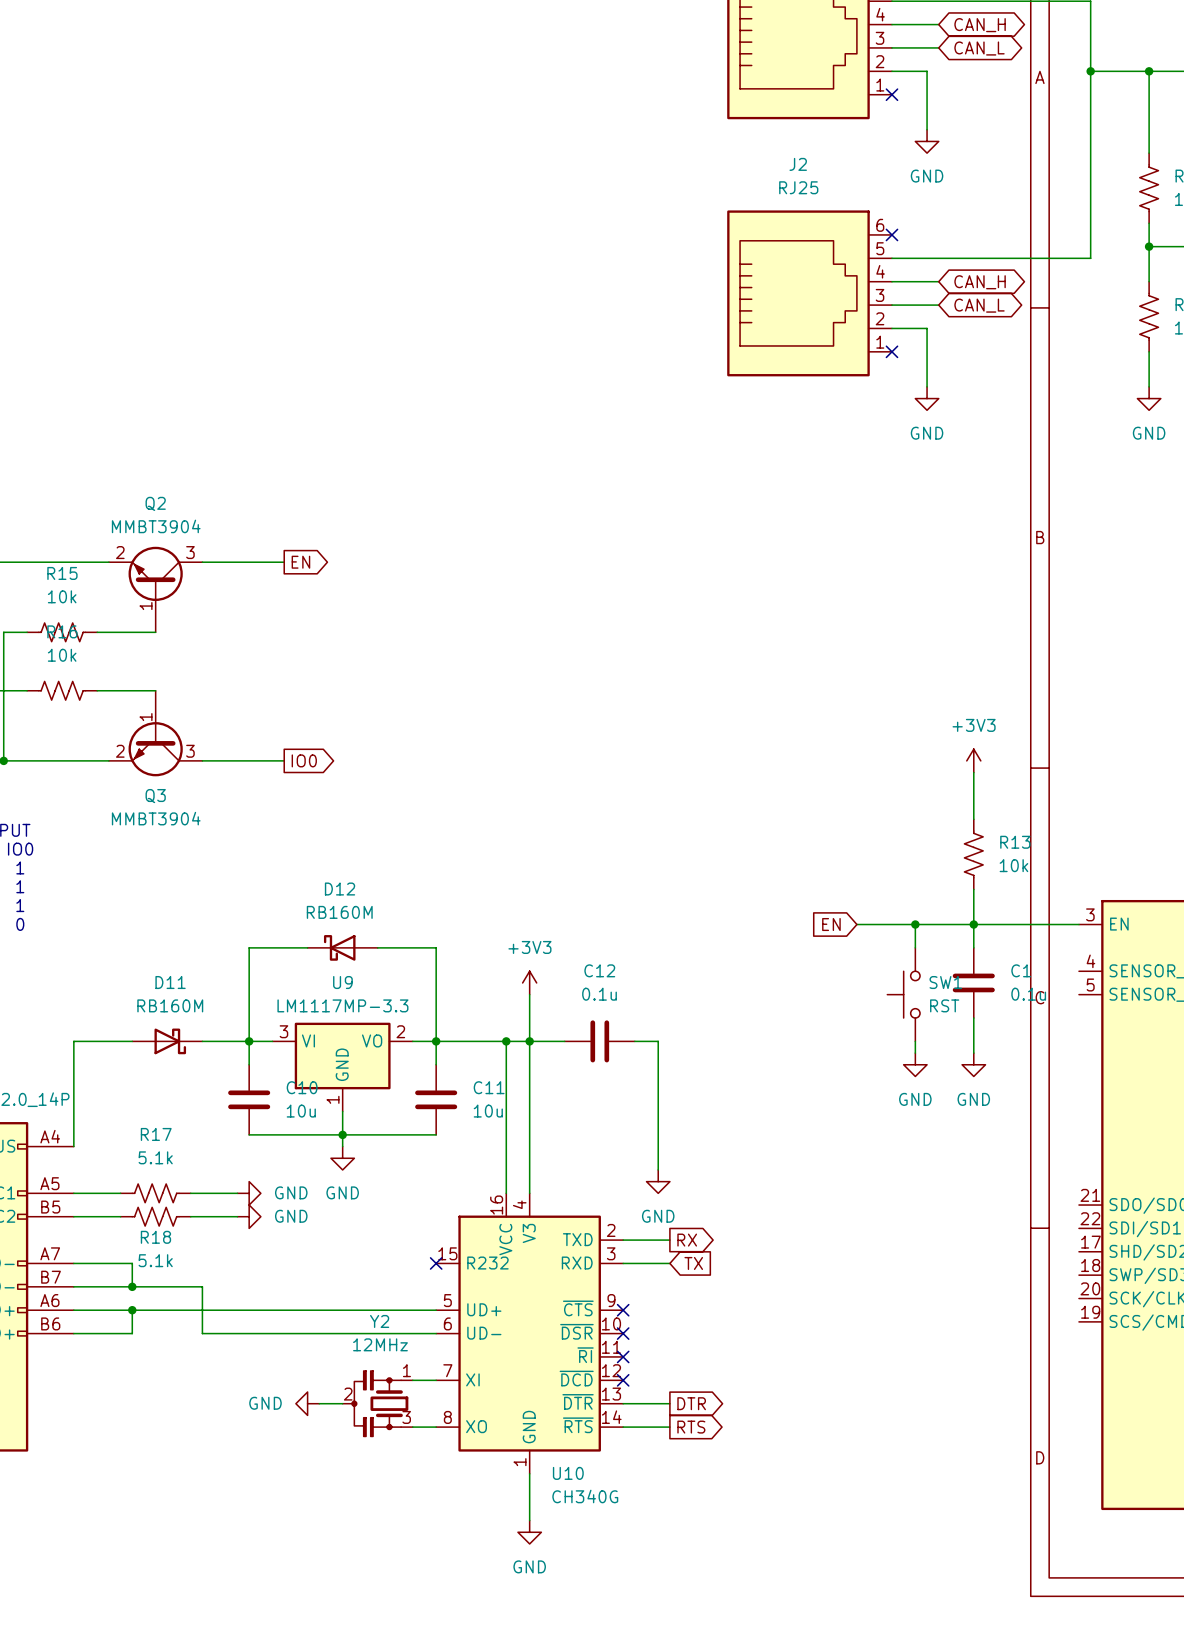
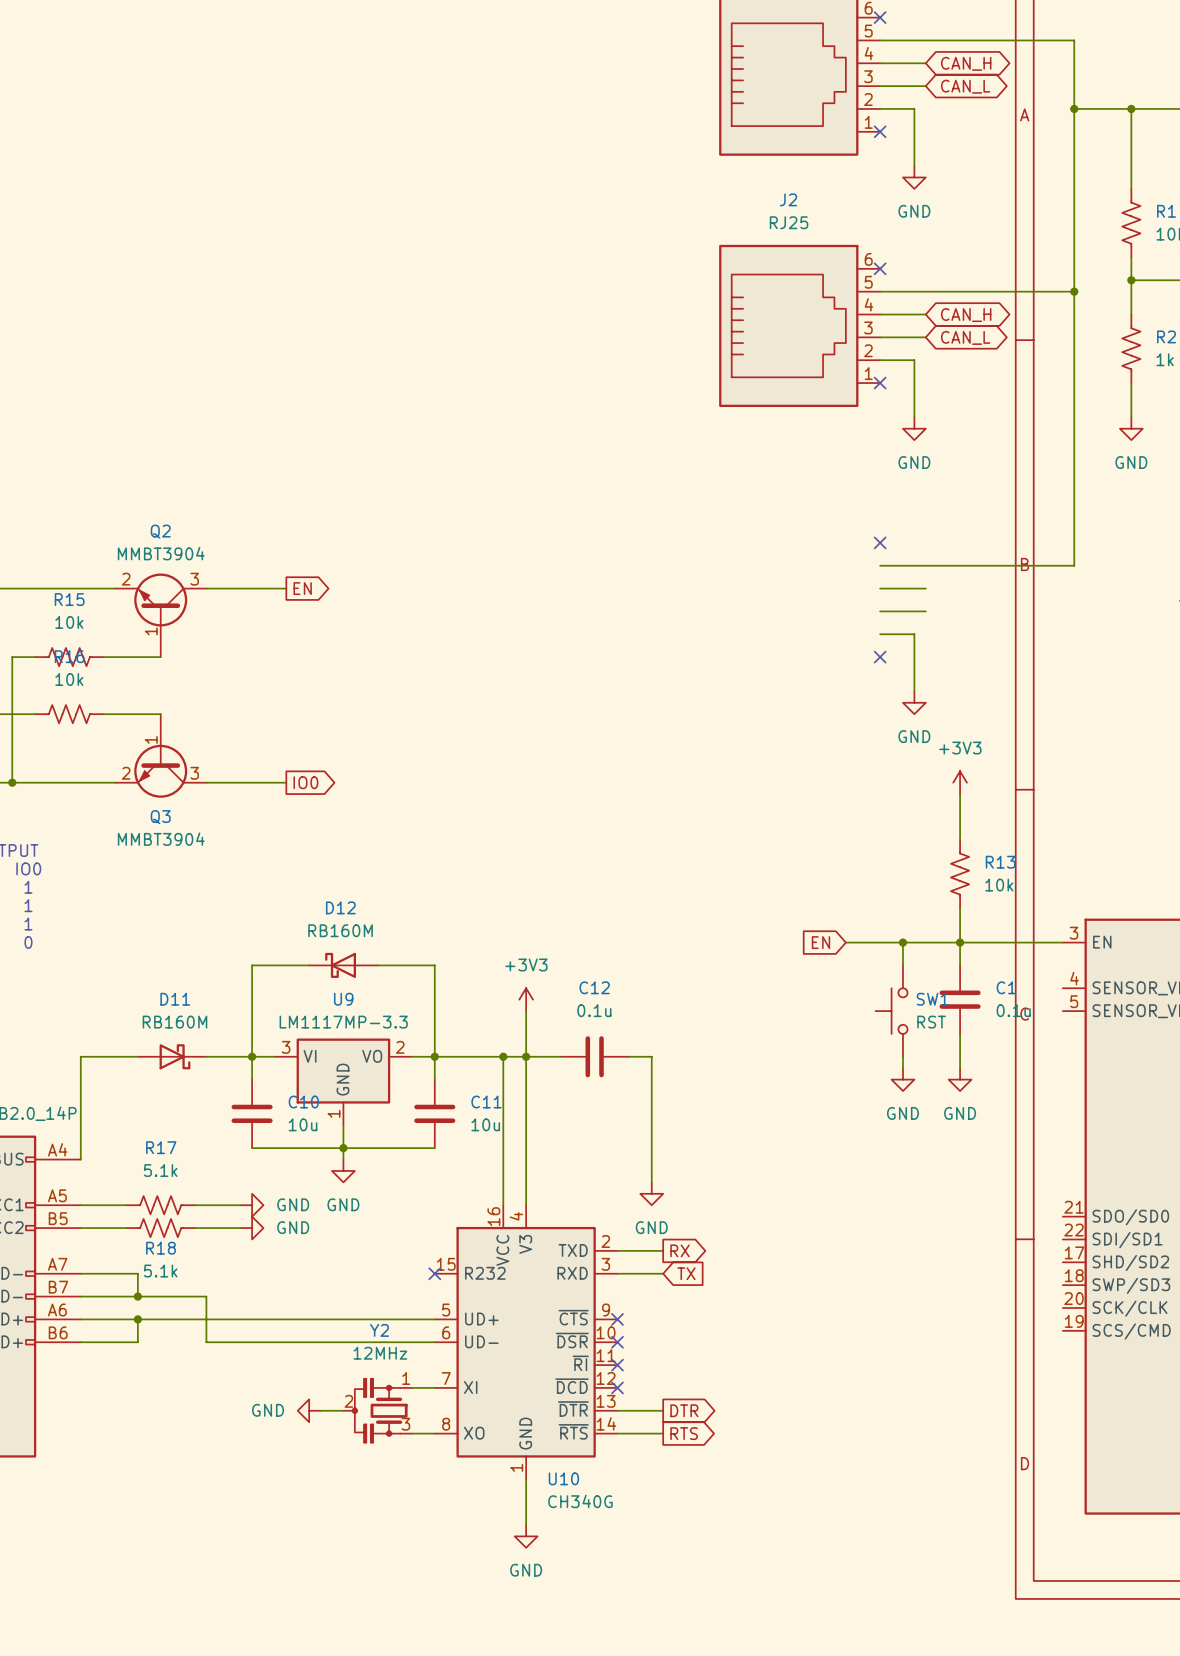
wire: none -> (1074, 291) (1074, 565) (880, 565)
junction: none -> (1074, 291)
no-connect mark: none -> (880, 542)
wire: none -> (880, 588) (925, 588)
wire: none -> (880, 611) (925, 611)
wire: none -> (880, 634) (914, 634) (914, 691)
no-connect mark: none -> (880, 657)
power symbol: none -> GND (914, 702)

